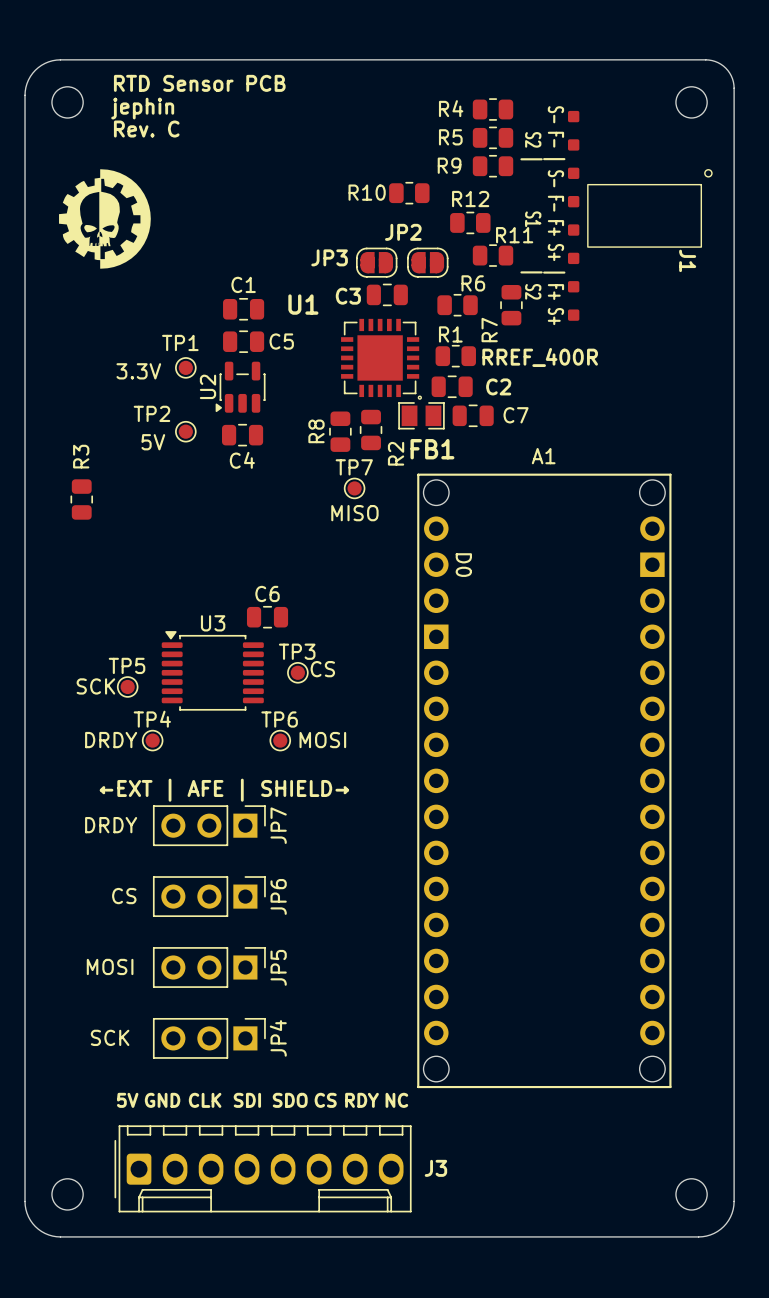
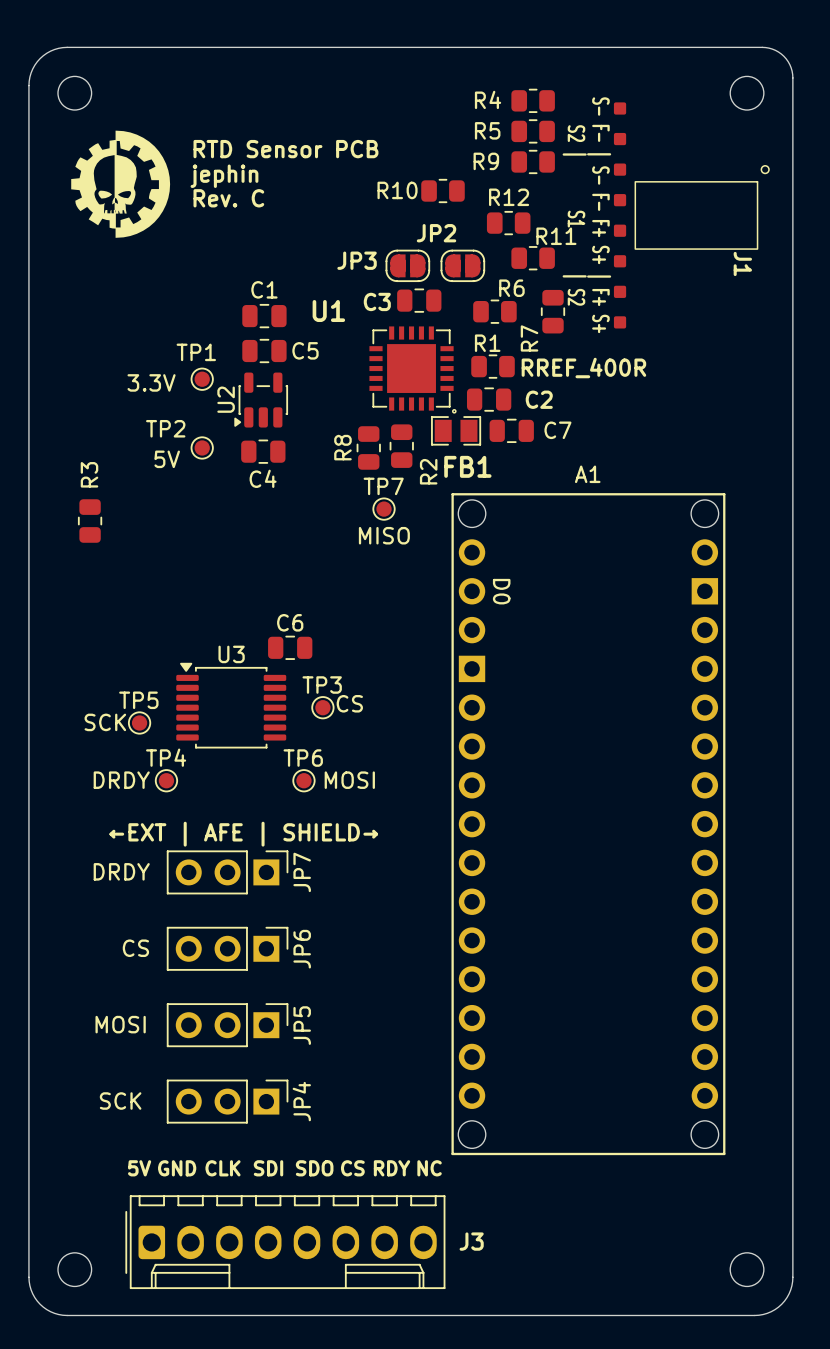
text position: RTD Sensor PCB (199, 83) -> RTD Sensor PCB (285, 149)
text position: jephin (142, 108) -> jephin (224, 176)
text position: Rev. C (146, 129) -> Rev. C (228, 198)
drawing position: (104, 218) -> (120, 184)
drawing position: (90, 228) -> (105, 194)

